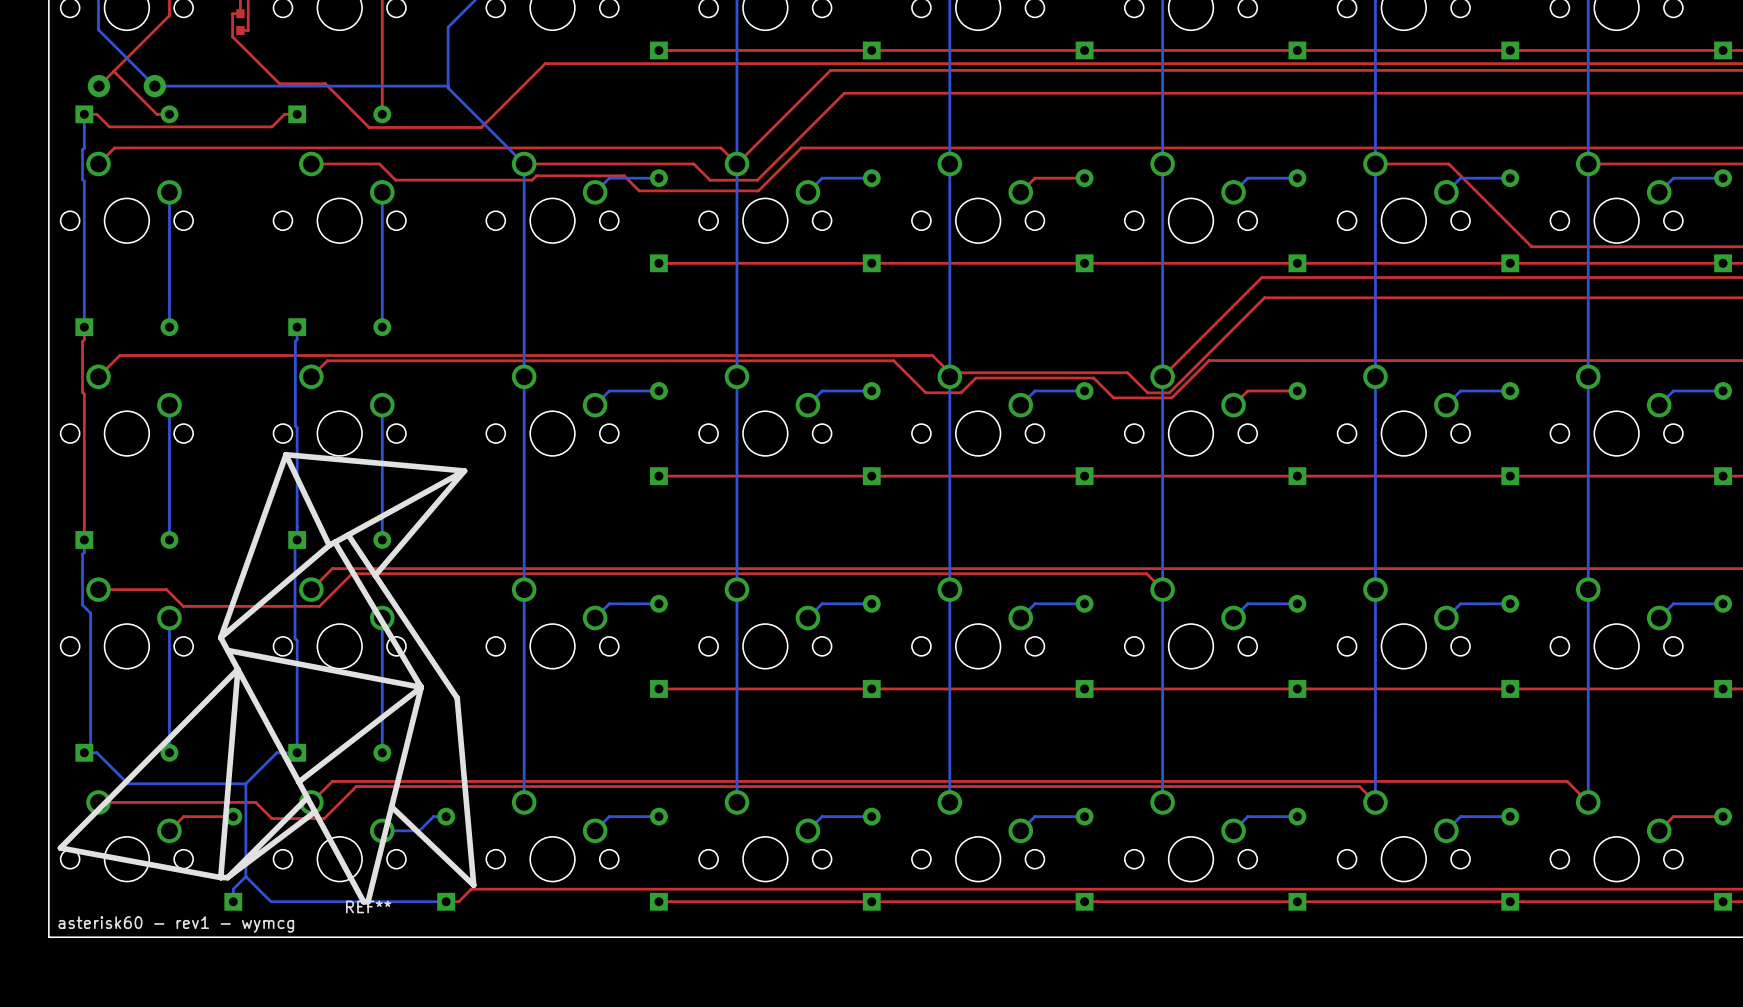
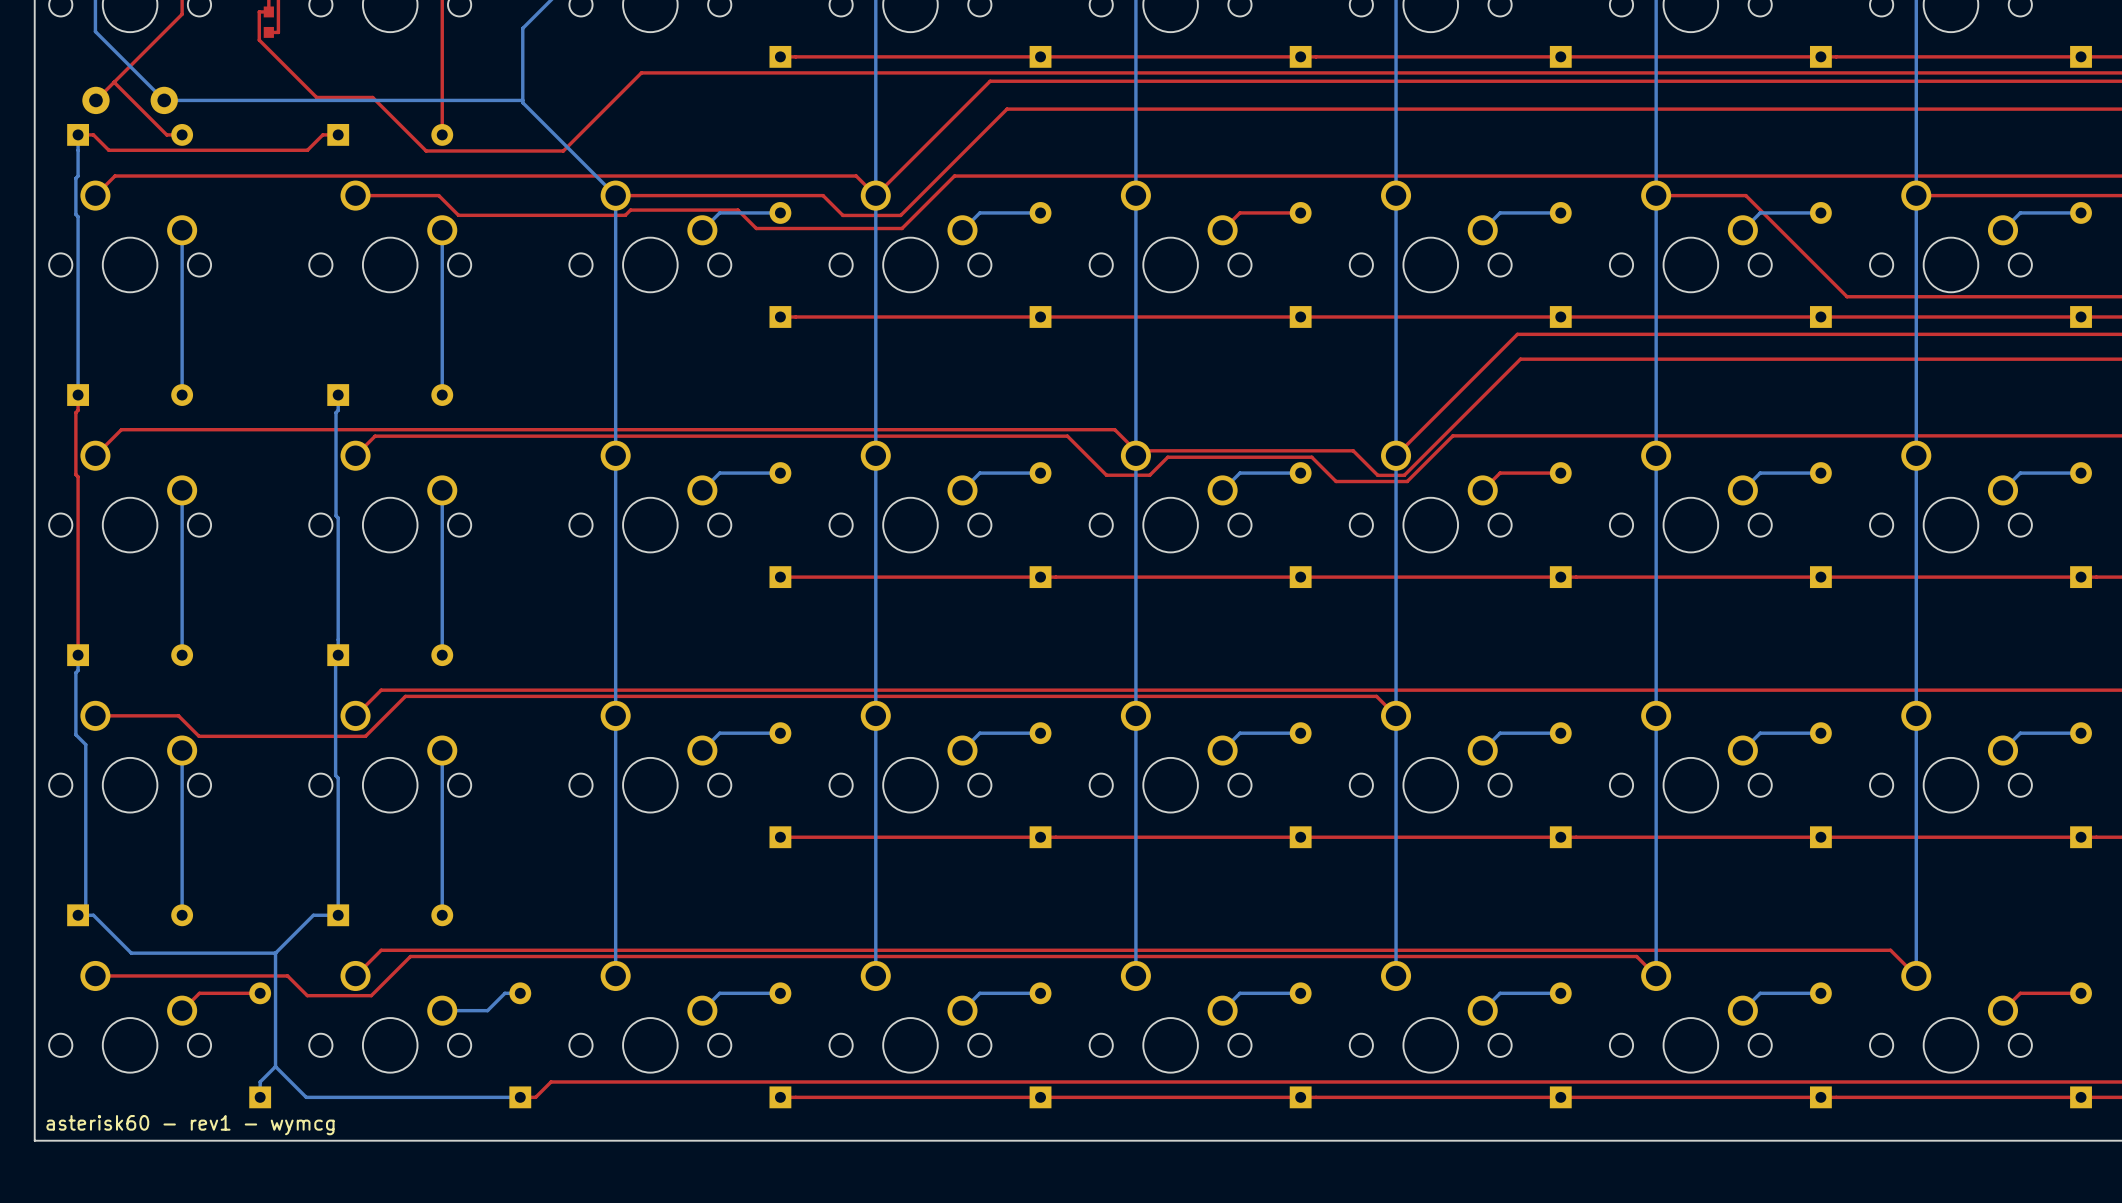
REF**: (267, 678) -> none

